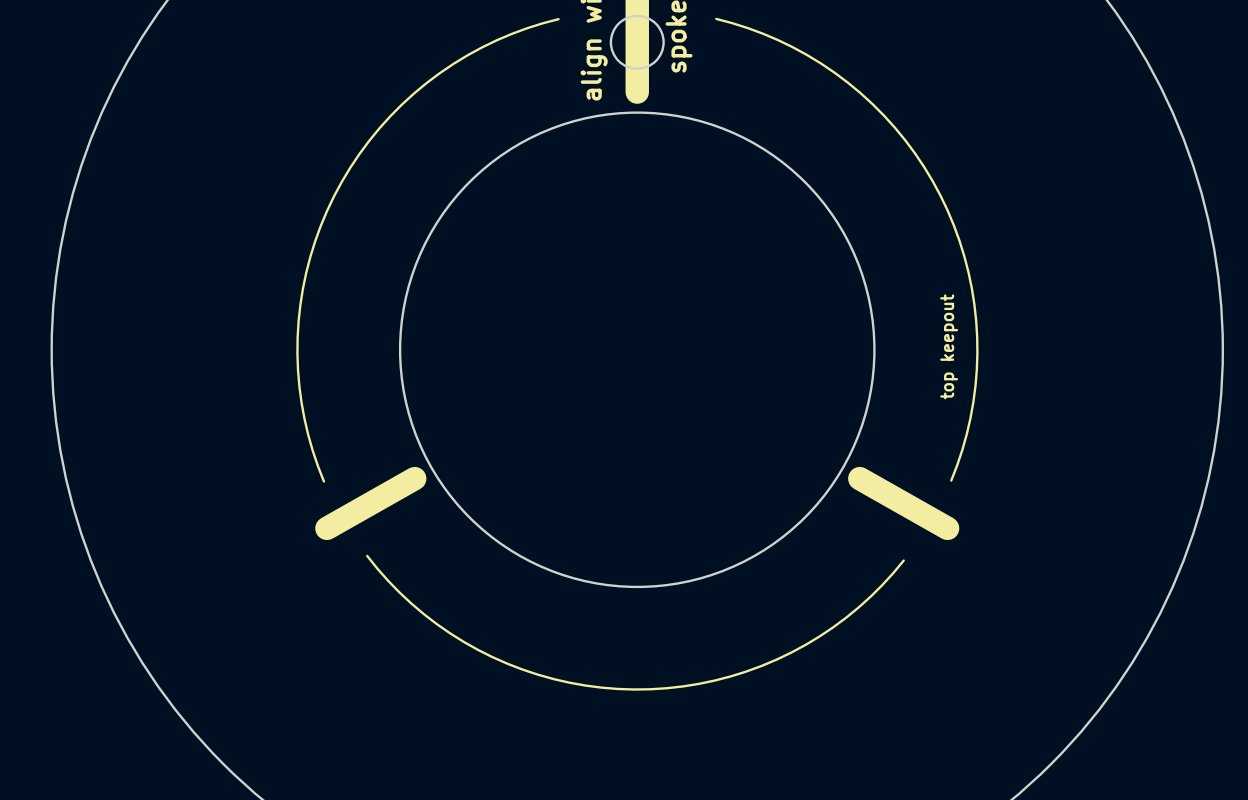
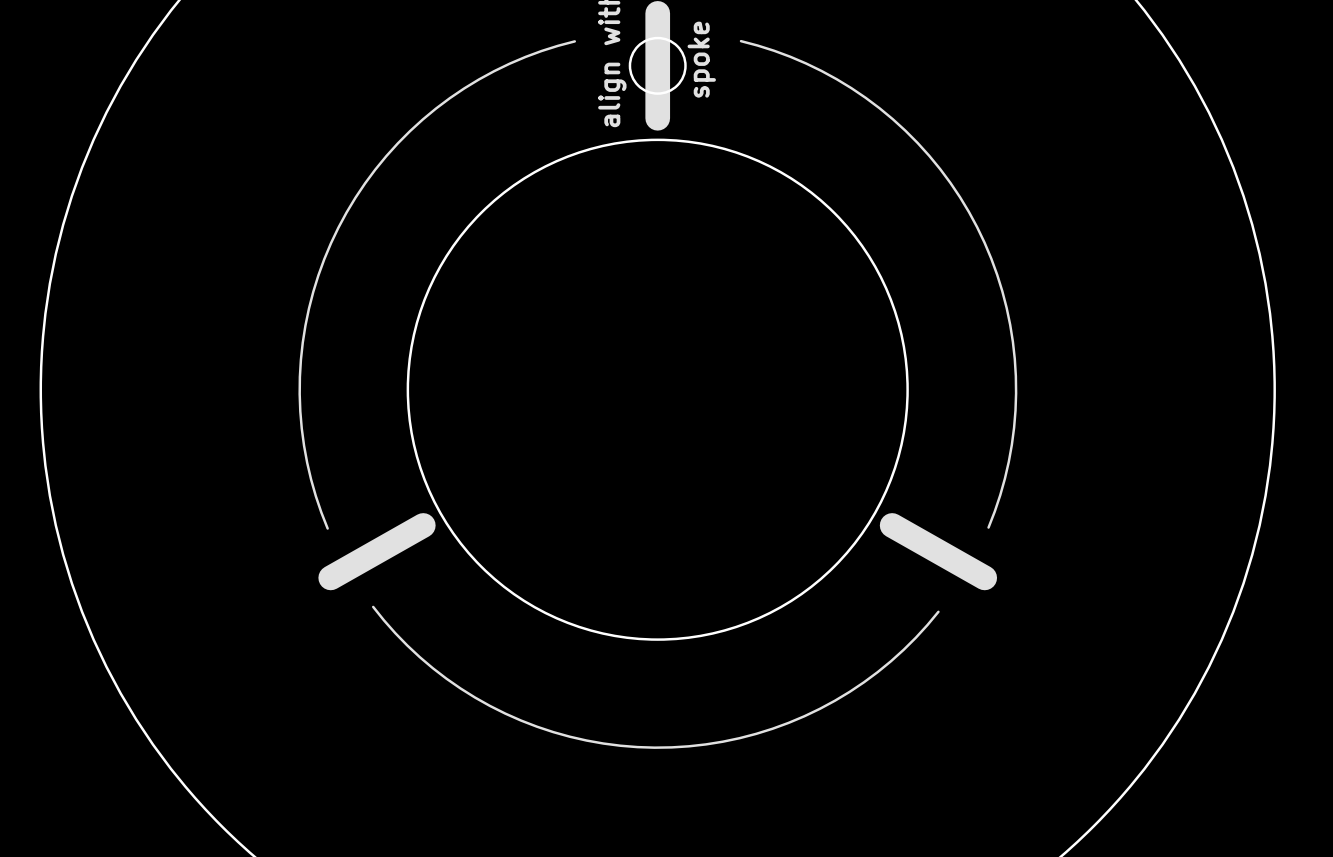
text: top keepout (949, 346) -> none

